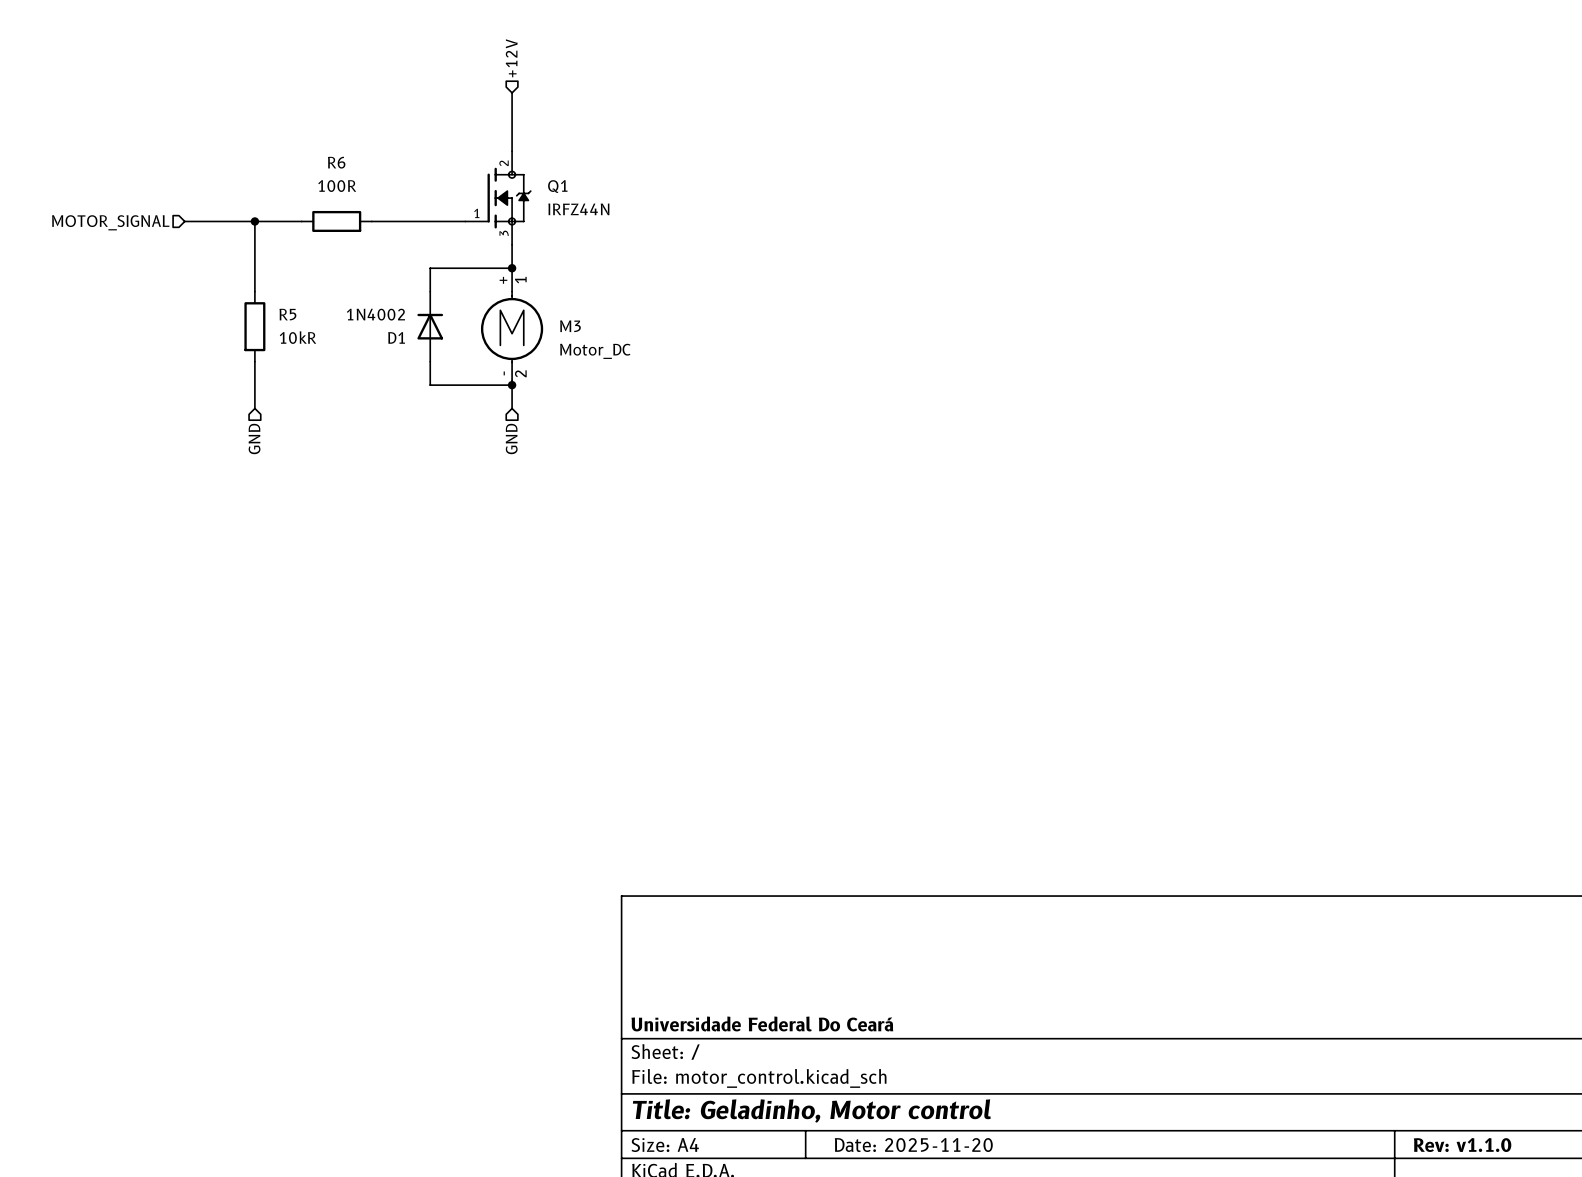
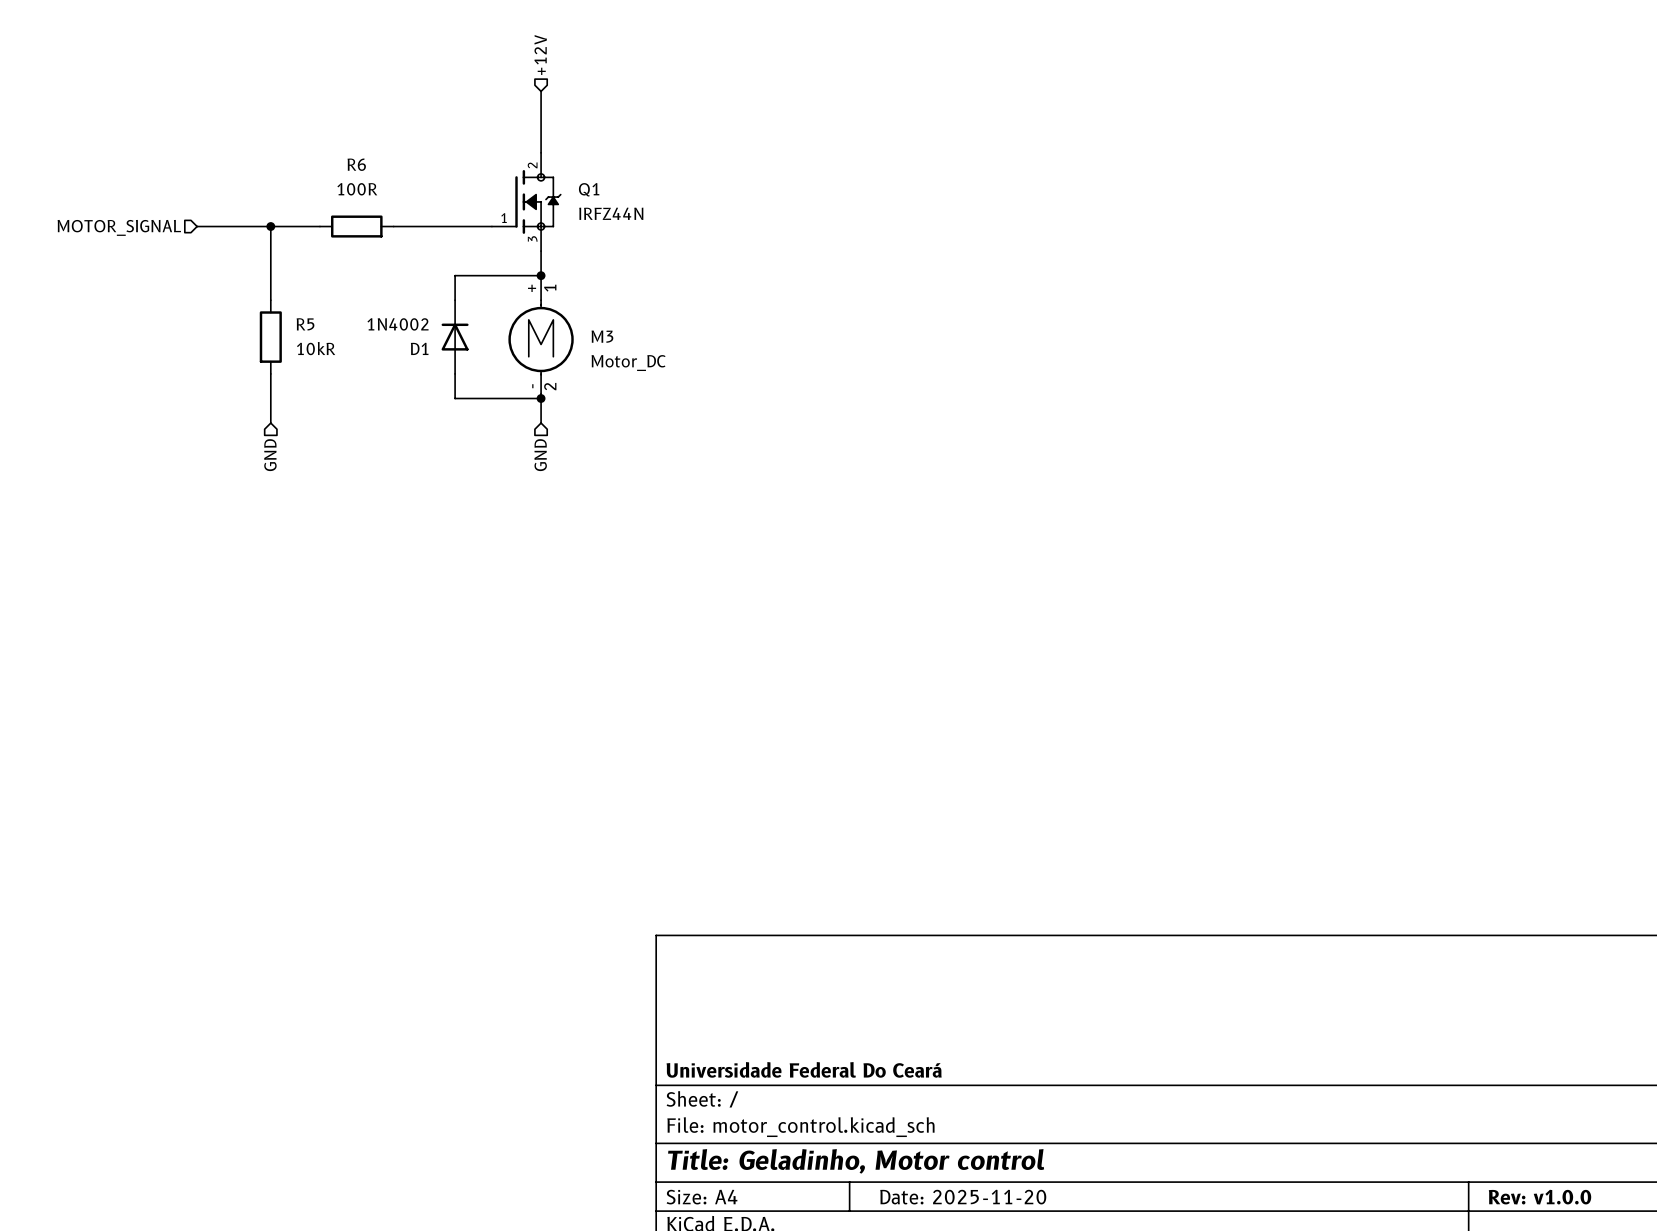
title block: Rev: v1.1.0 (1462, 1145) -> Rev: v1.0.0 (1540, 1197)

